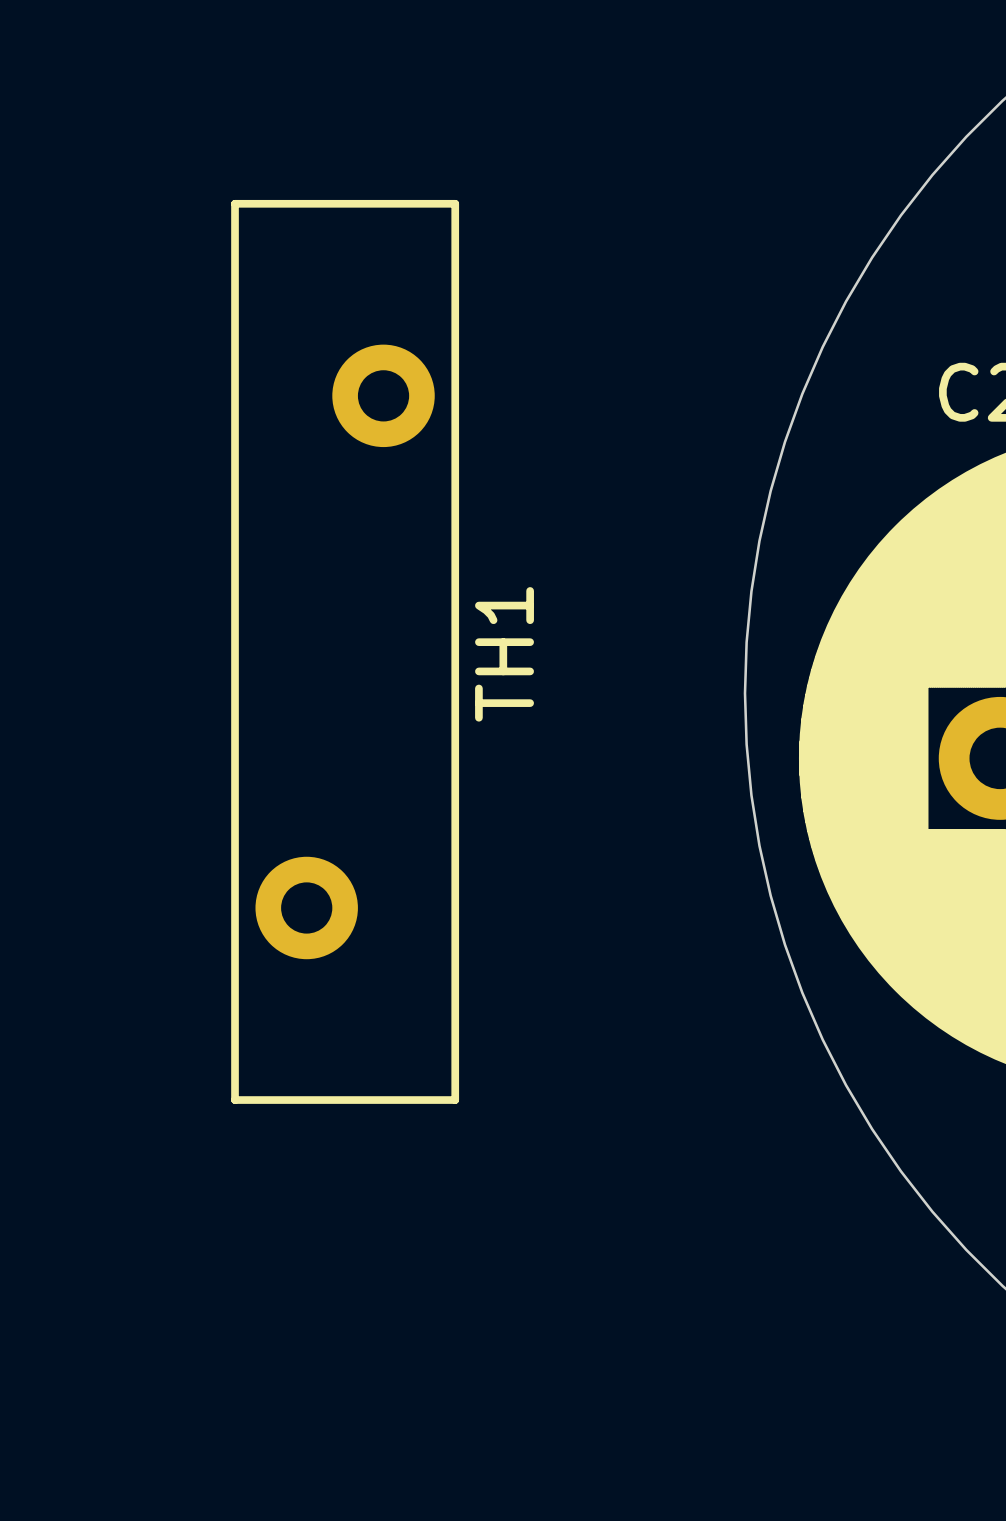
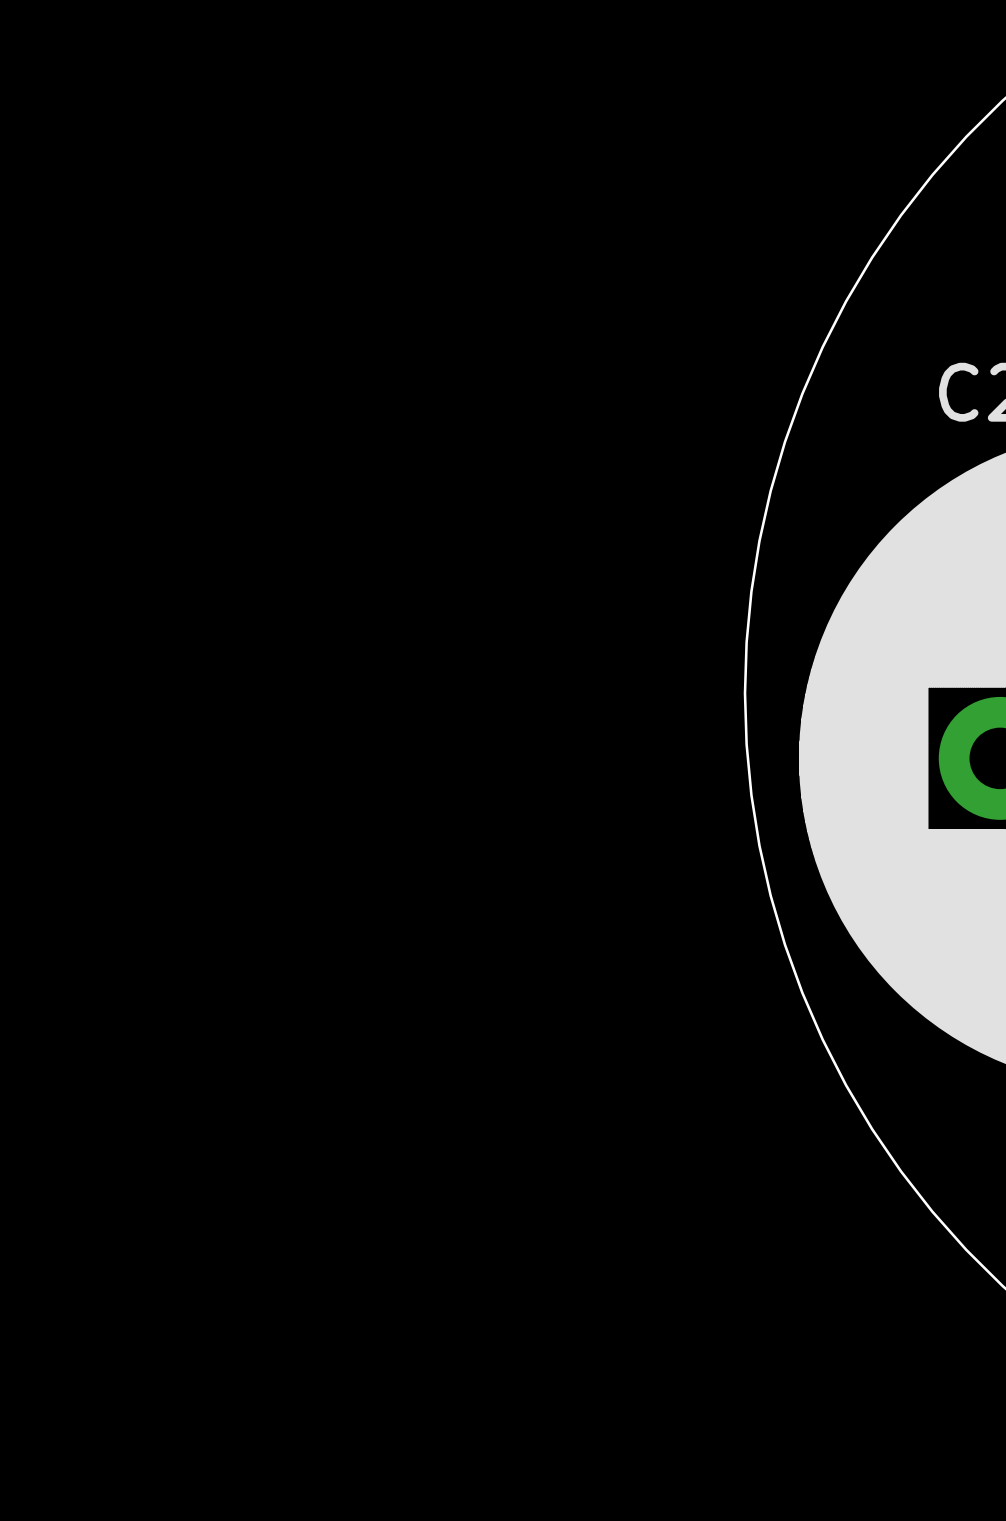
TH1: (345, 651) -> none

